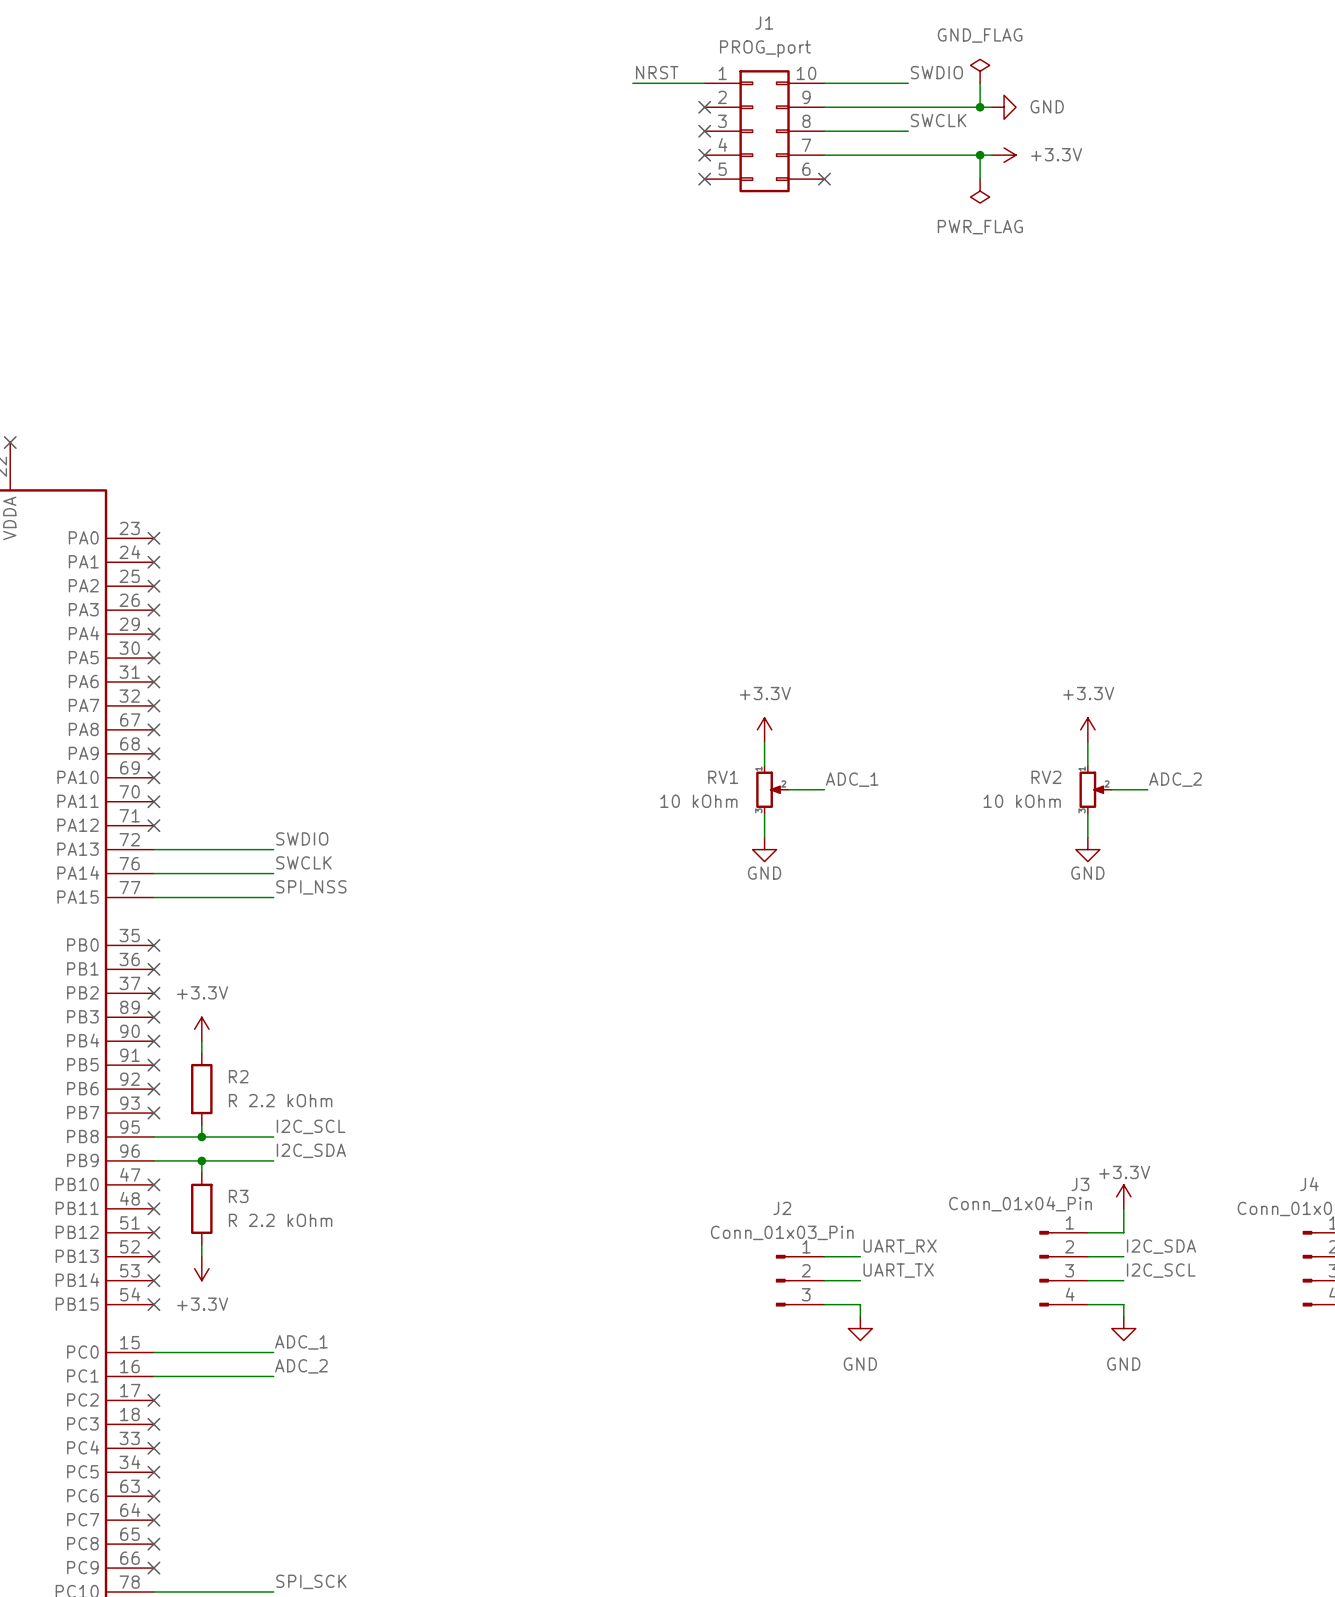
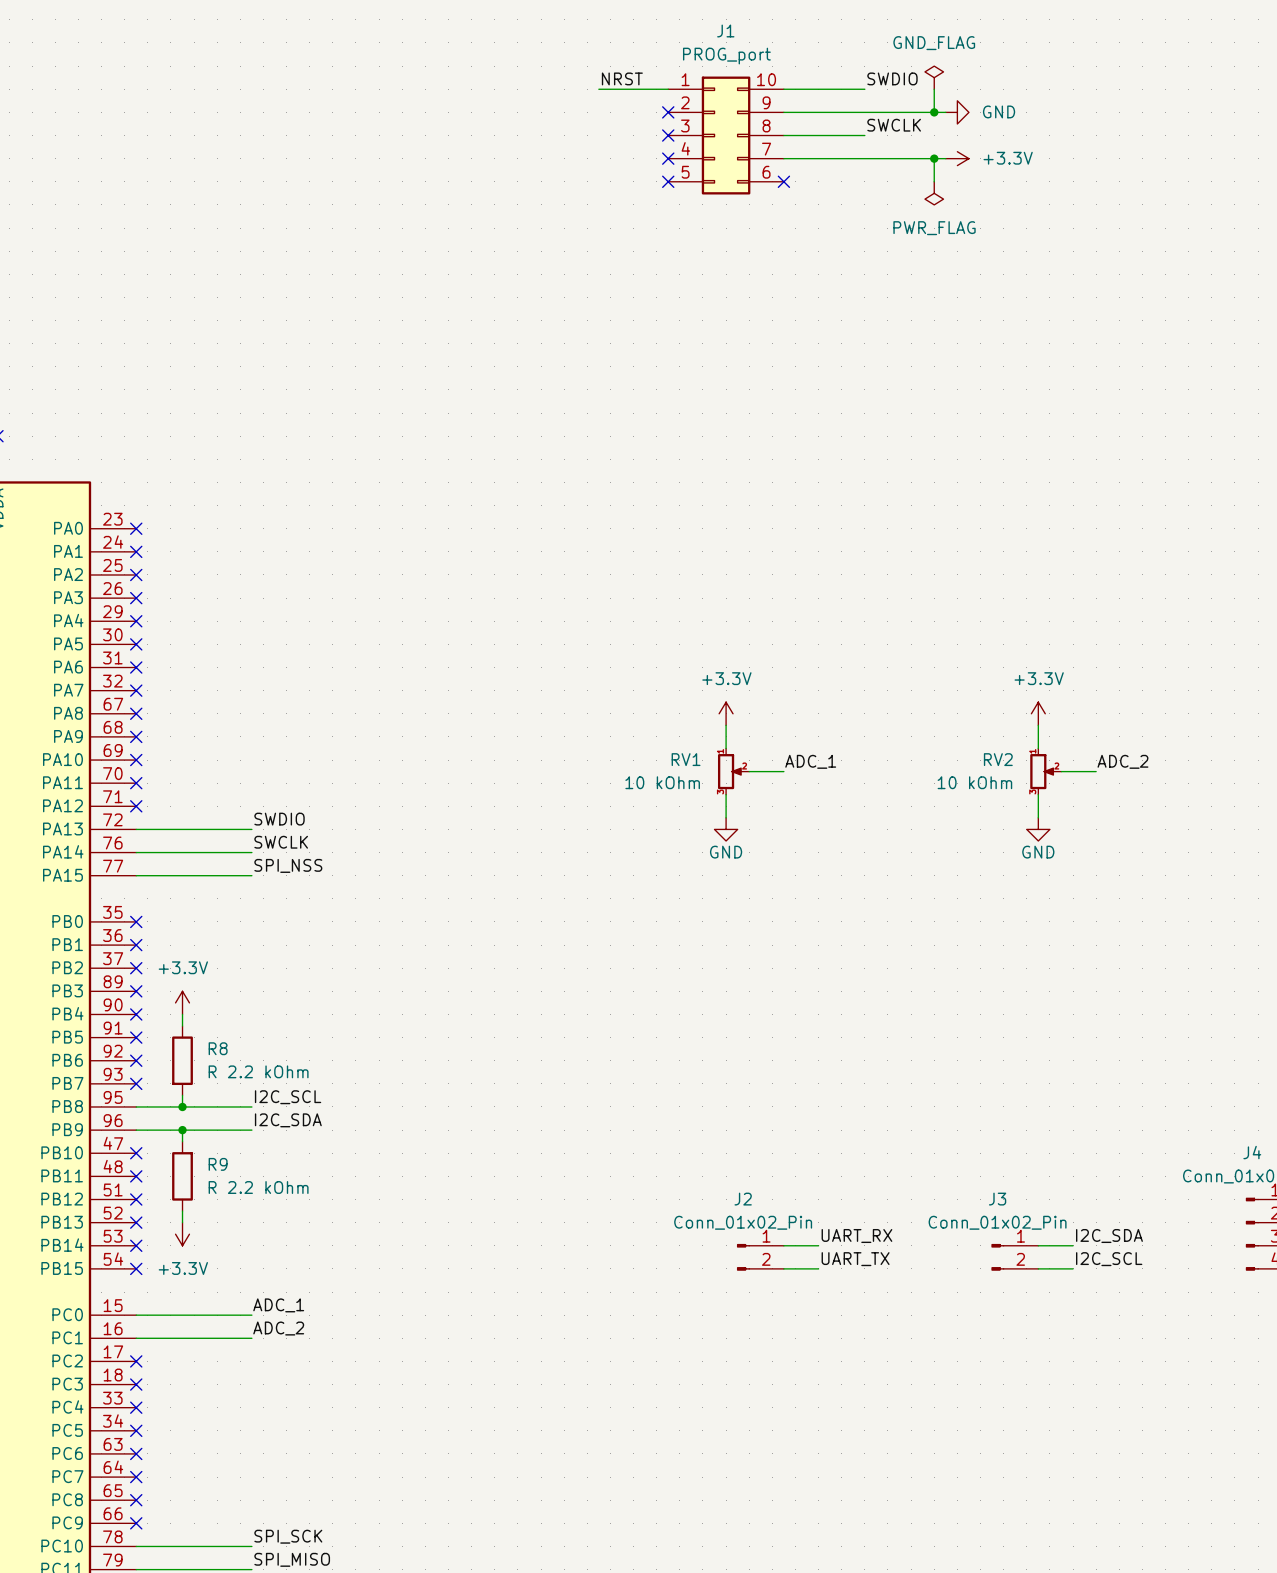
R2 name: R2 (238, 1076) -> R8 (218, 1048)
J3 name position: J3 (1080, 1184) -> J3 (997, 1199)
R3 name: R3 (238, 1196) -> R9 (218, 1164)
power symbol: +3.3V (1123, 1196) -> none
J3 value: Conn_01x04_Pin (1020, 1203) -> Conn_01x02_Pin (997, 1222)
wire: (1123, 1208) (1123, 1232) (1087, 1232) -> none
J3 symbol: [1039, 1230, 1088, 1307] -> [991, 1243, 1039, 1271]
J2 value: Conn_01x03_Pin (782, 1232) -> Conn_01x02_Pin (743, 1222)
label: UART_RX (900, 1246) -> none
label: I2C_SDA (1161, 1246) -> none
J2 symbol: [775, 1254, 825, 1307] -> [736, 1243, 784, 1271]
wire: (824, 1256) (860, 1256) -> none
wire: (1087, 1256) (1123, 1256) -> none
label: UART_TX (898, 1270) -> UART_RX (856, 1236)
label: I2C_SCL (1161, 1270) -> I2C_SDA (1109, 1236)
label: none -> UART_TX (855, 1259)
label: none -> I2C_SCL (1109, 1259)
wire: (860, 1304) (860, 1316) -> none
wire: (1123, 1304) (1123, 1316) -> none
power symbol: GND (860, 1328) -> none
power symbol: GND (1123, 1328) -> none

